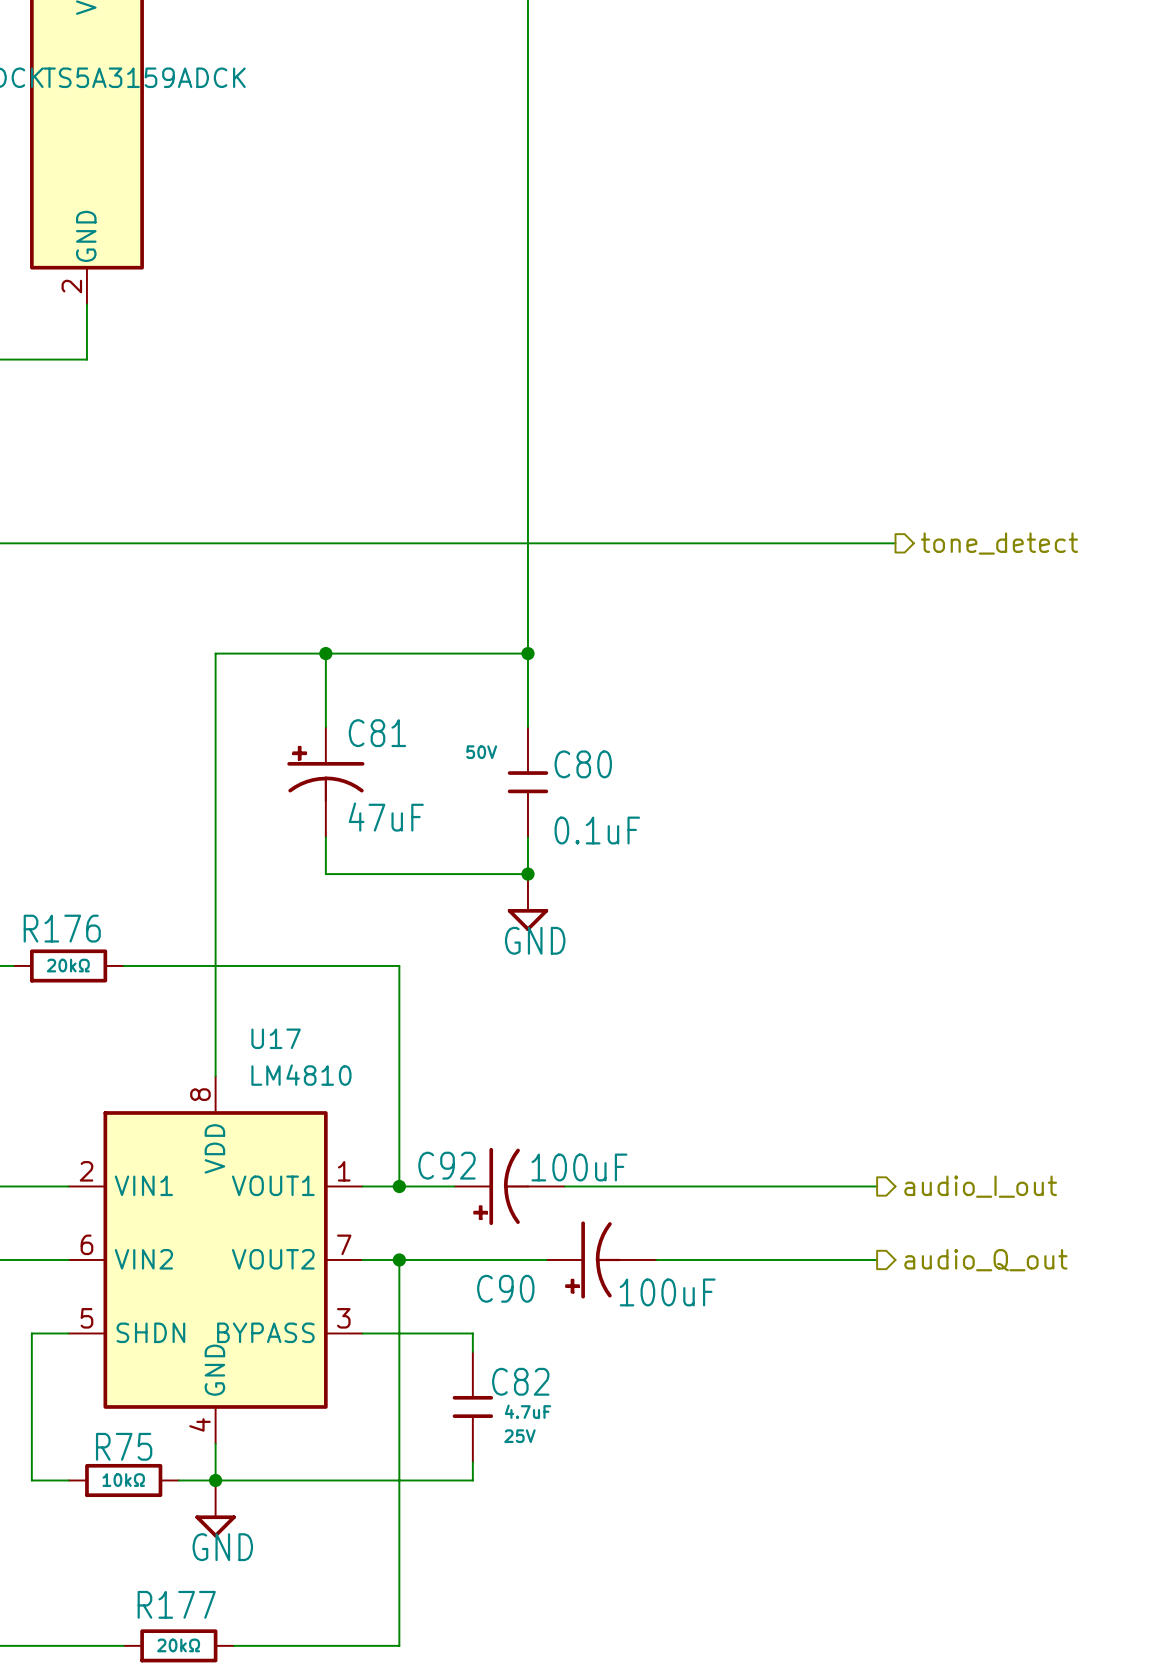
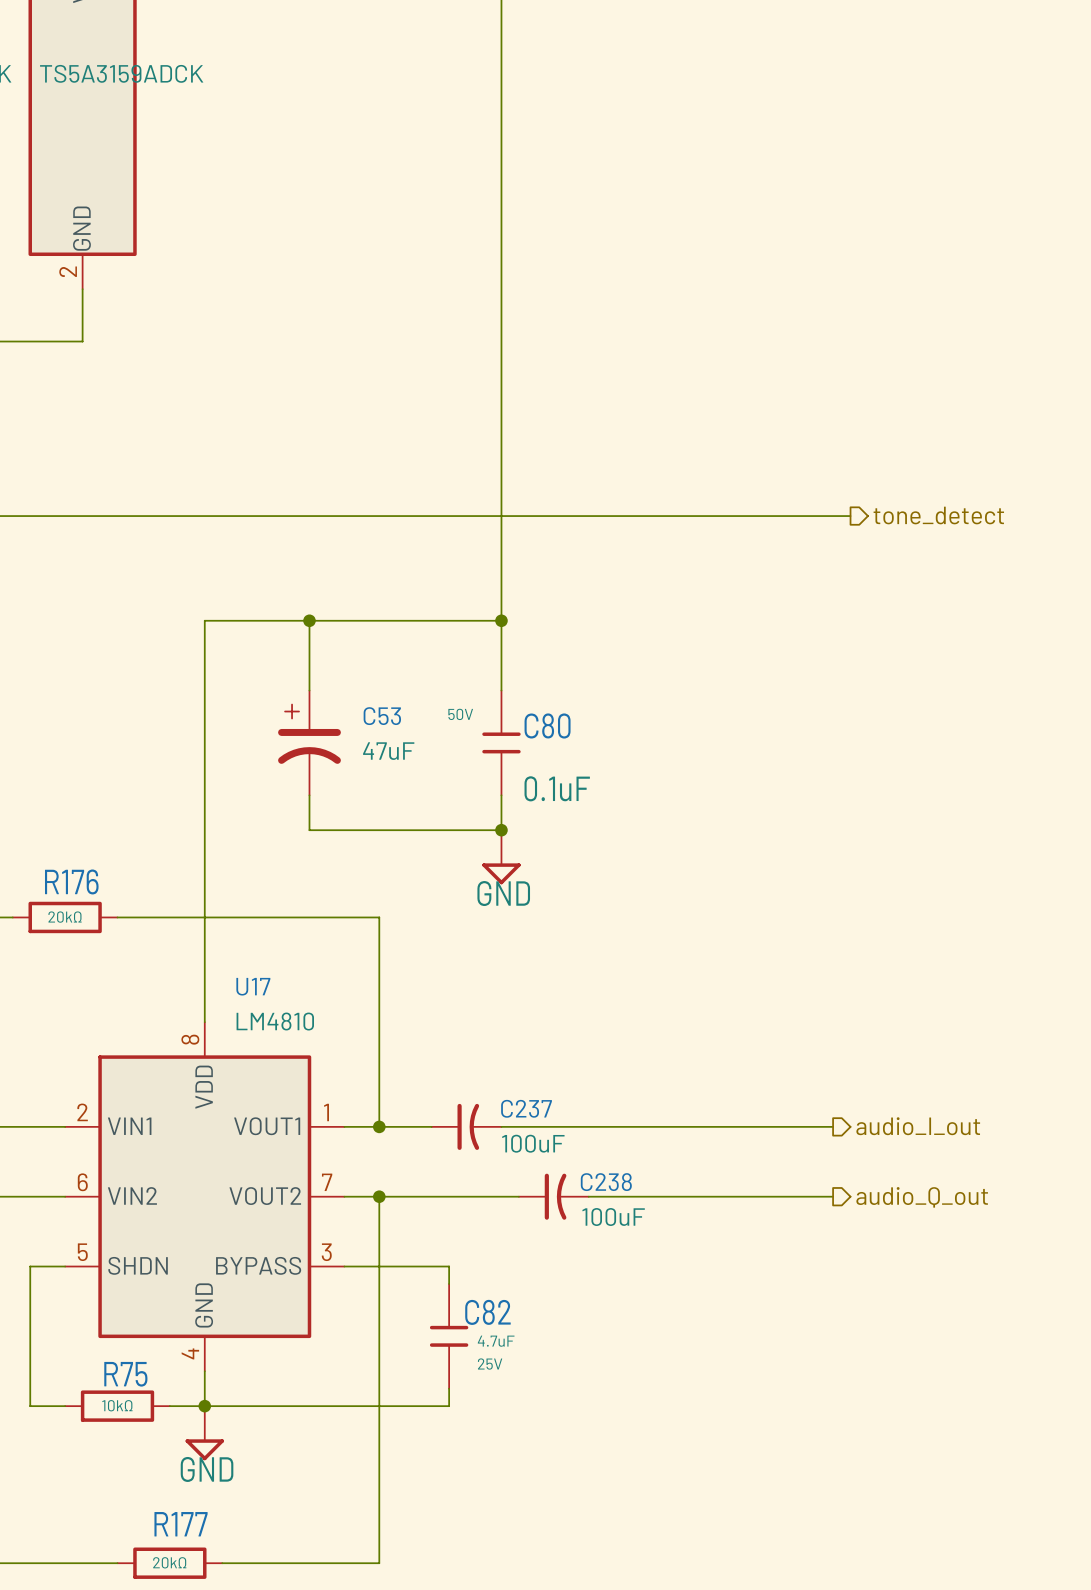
C81: 47uF (325, 782) -> none
C53: none -> 47uF (309, 742)
C237: none -> 100uF (466, 1126)
C92: 100uF (509, 1186) -> none
C238: none -> 100uF (553, 1196)
C90: 100uF (601, 1259) -> none

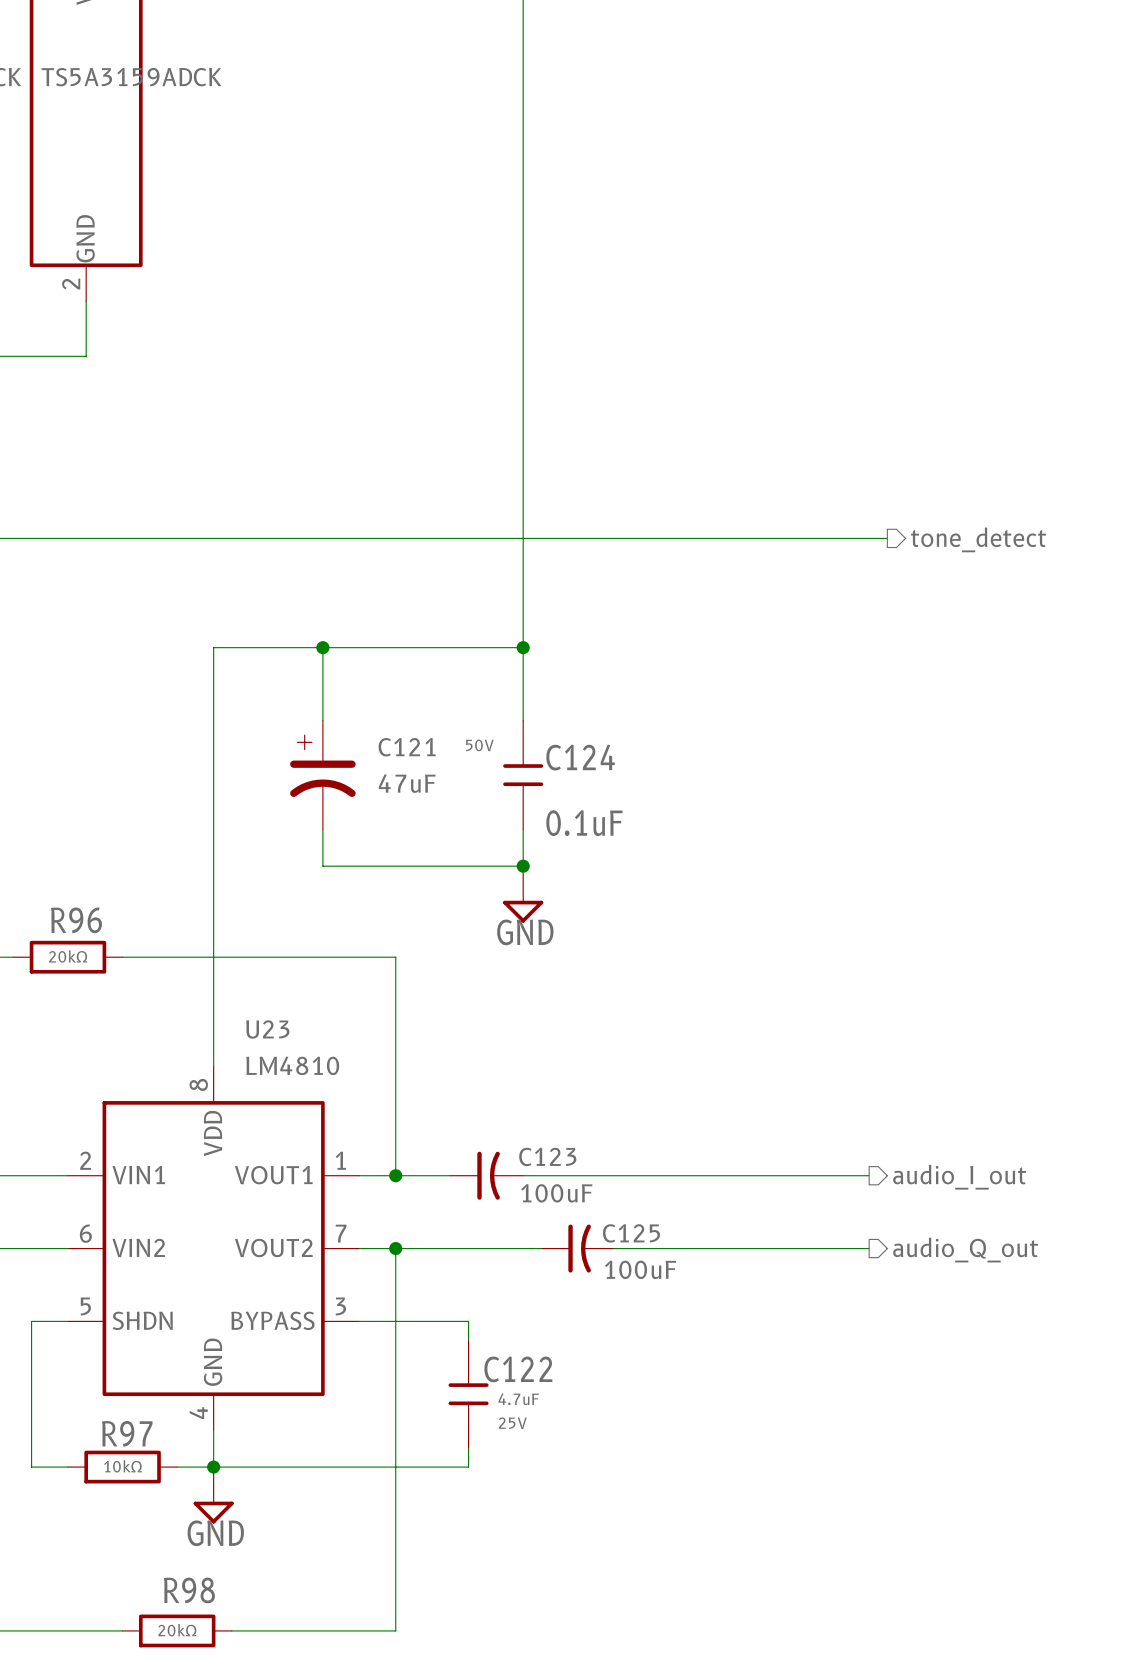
C53 name: C53 (382, 716) -> C121 (407, 747)
C80 name: C80 (547, 725) -> C124 (580, 757)
R176 name: R176 (71, 881) -> R96 (76, 920)
U17 name: U17 (253, 986) -> U23 (267, 1029)
C237 name: C237 (526, 1108) -> C123 (547, 1156)
C238 name: C238 (606, 1182) -> C125 (631, 1233)
C82 name: C82 (487, 1312) -> C122 (518, 1369)
R75 name: R75 (125, 1374) -> R97 (127, 1433)
R177 name: R177 (181, 1524) -> R98 (189, 1590)

